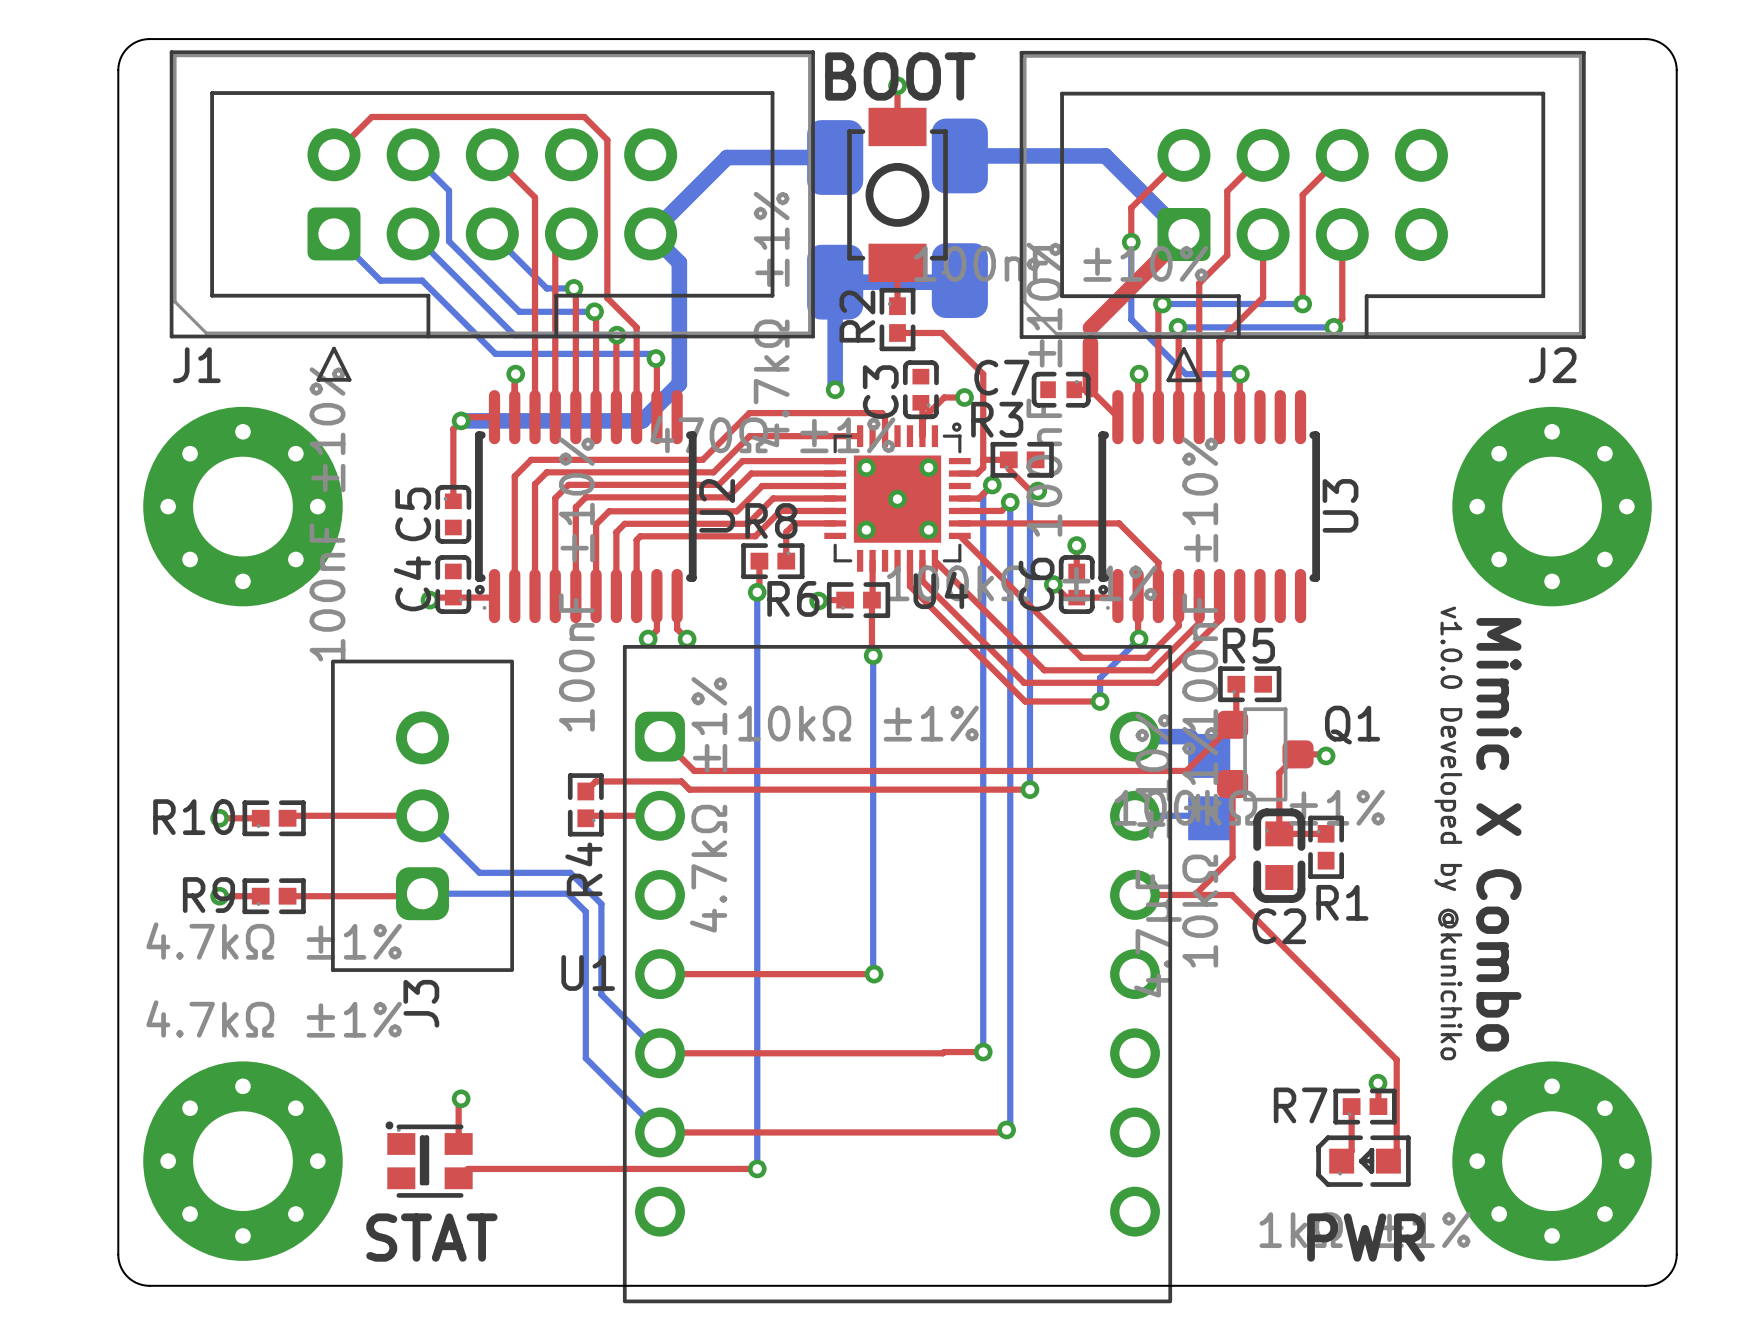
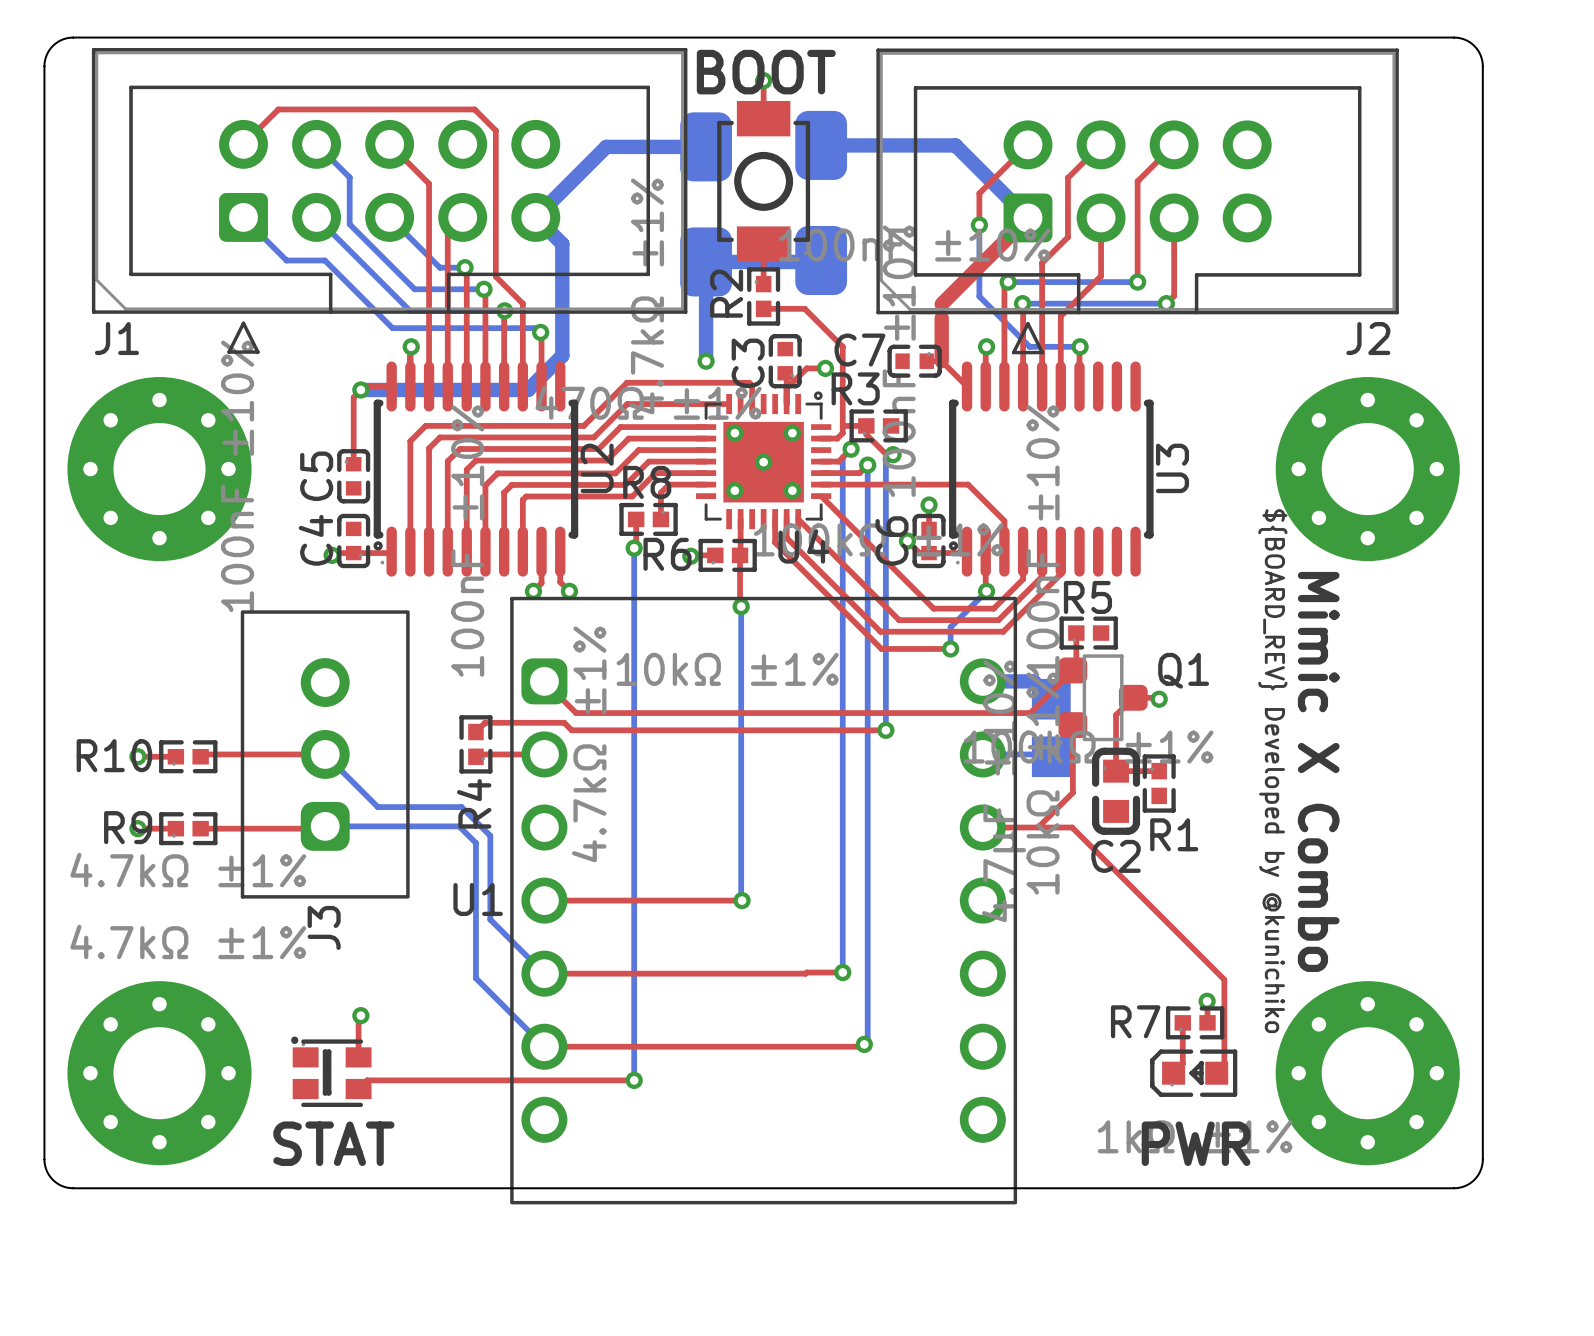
text: v1.0.0 Developed by @kunichiko (1448, 833) -> ${BOARD_REV} Developed by @kunichiko (1272, 771)

